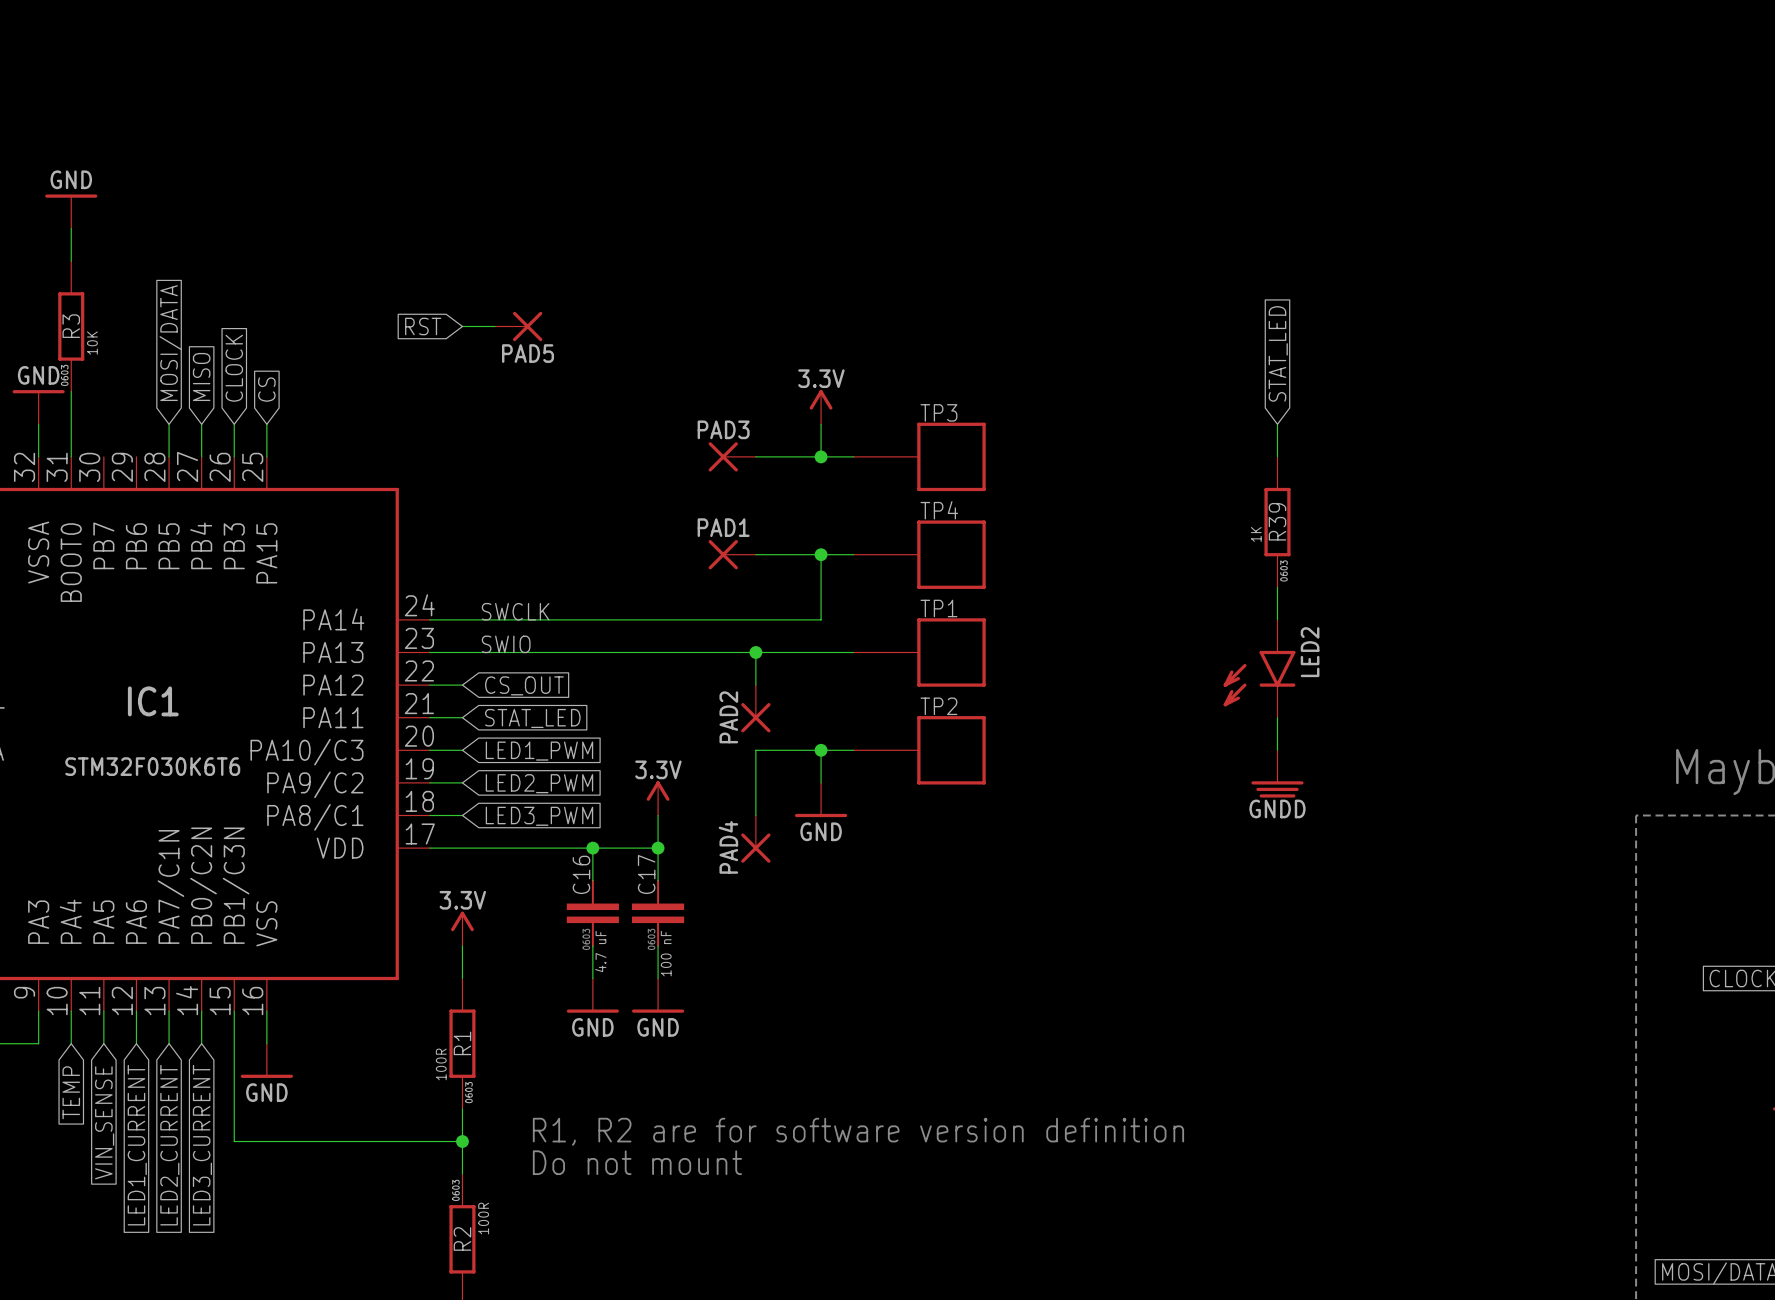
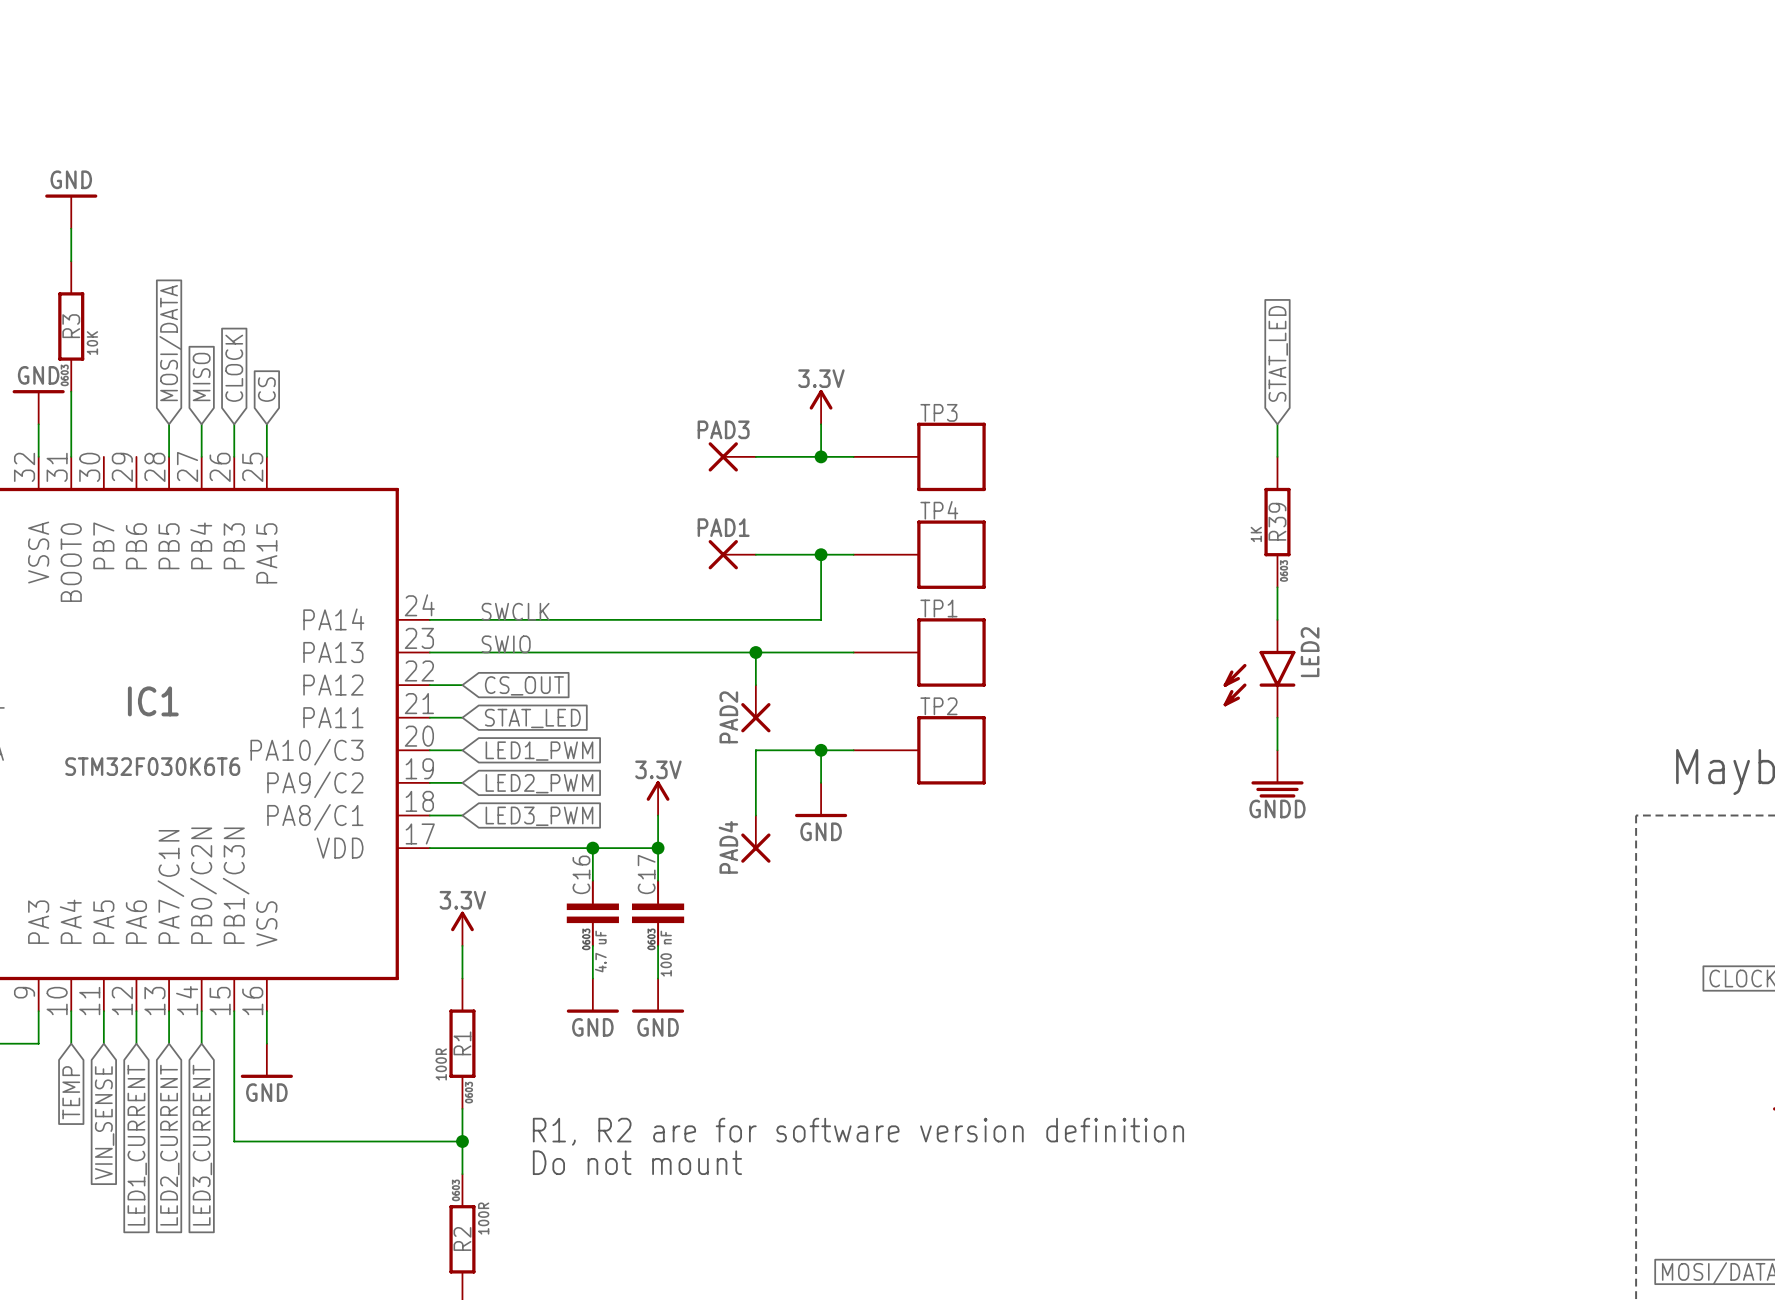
global label: RST (423, 326) -> none
wire: (462, 326) (495, 326) -> none
PAD5: (518, 326) -> none

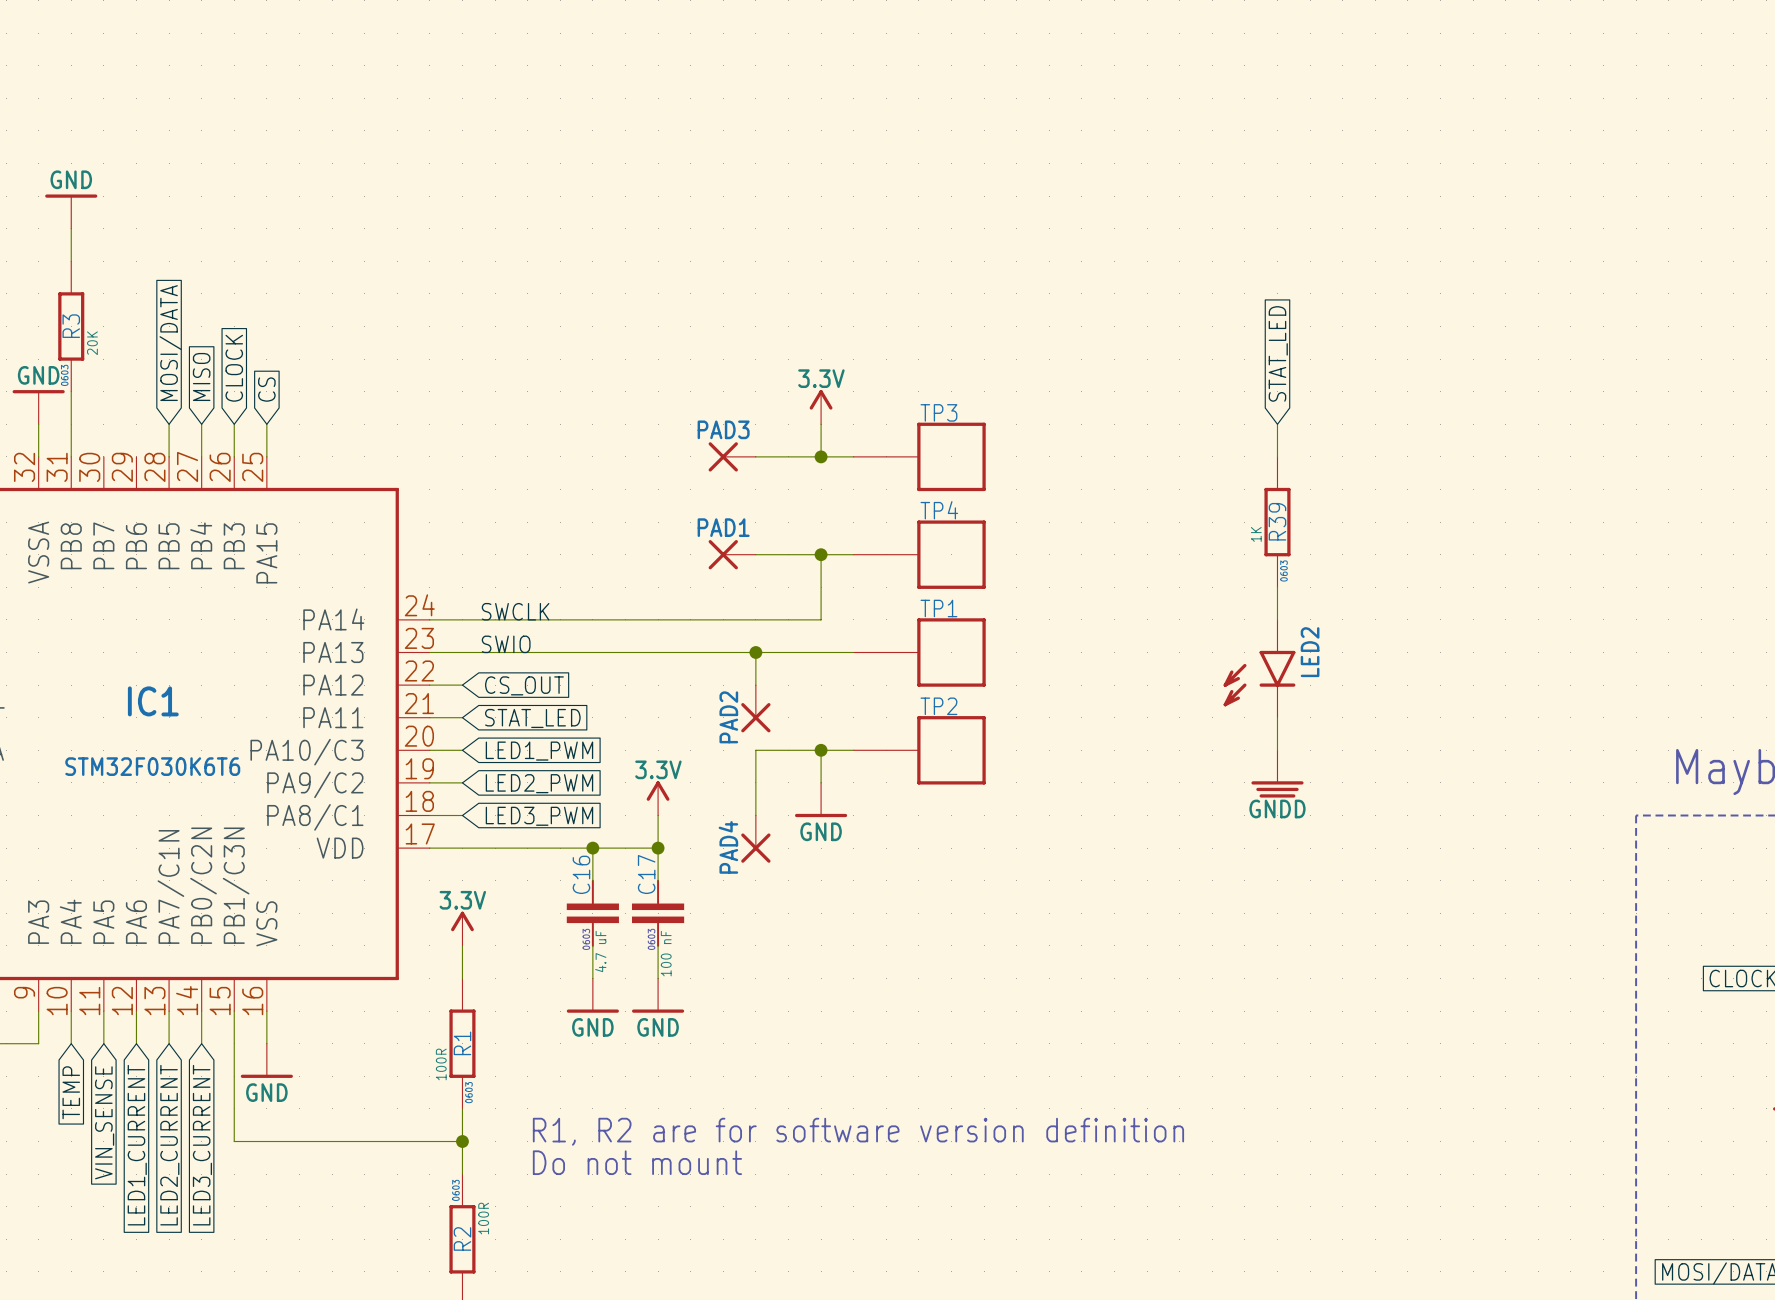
R3 value: 10K (92, 343) -> 20K (92, 343)
IC1 pin name: BOOT0 (71, 562) -> PB8 (71, 546)

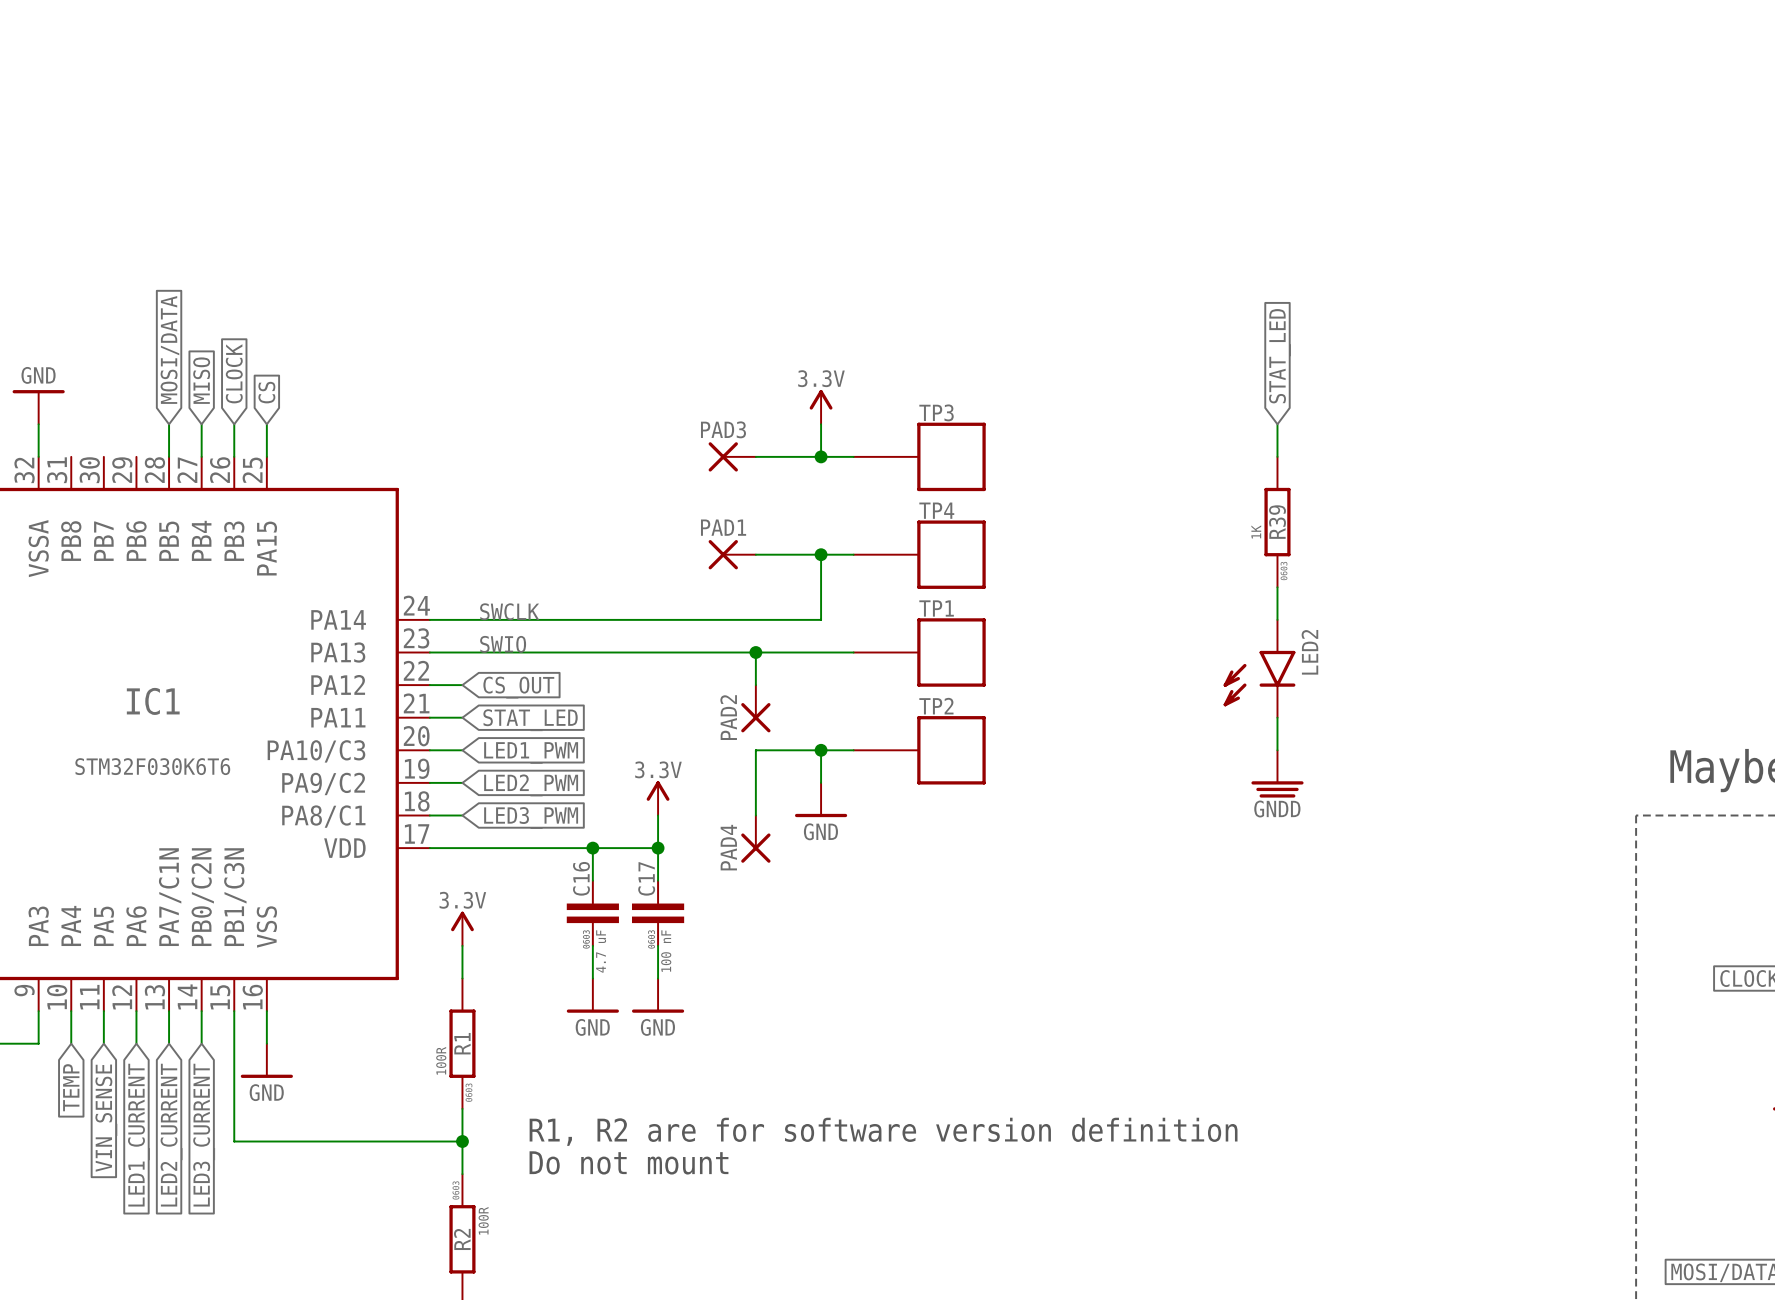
power symbol: GND (71, 211) -> none
wire: (71, 228) (71, 261) -> none
R3: 20K (71, 326) -> none
wire: (71, 391) (71, 456) -> none

